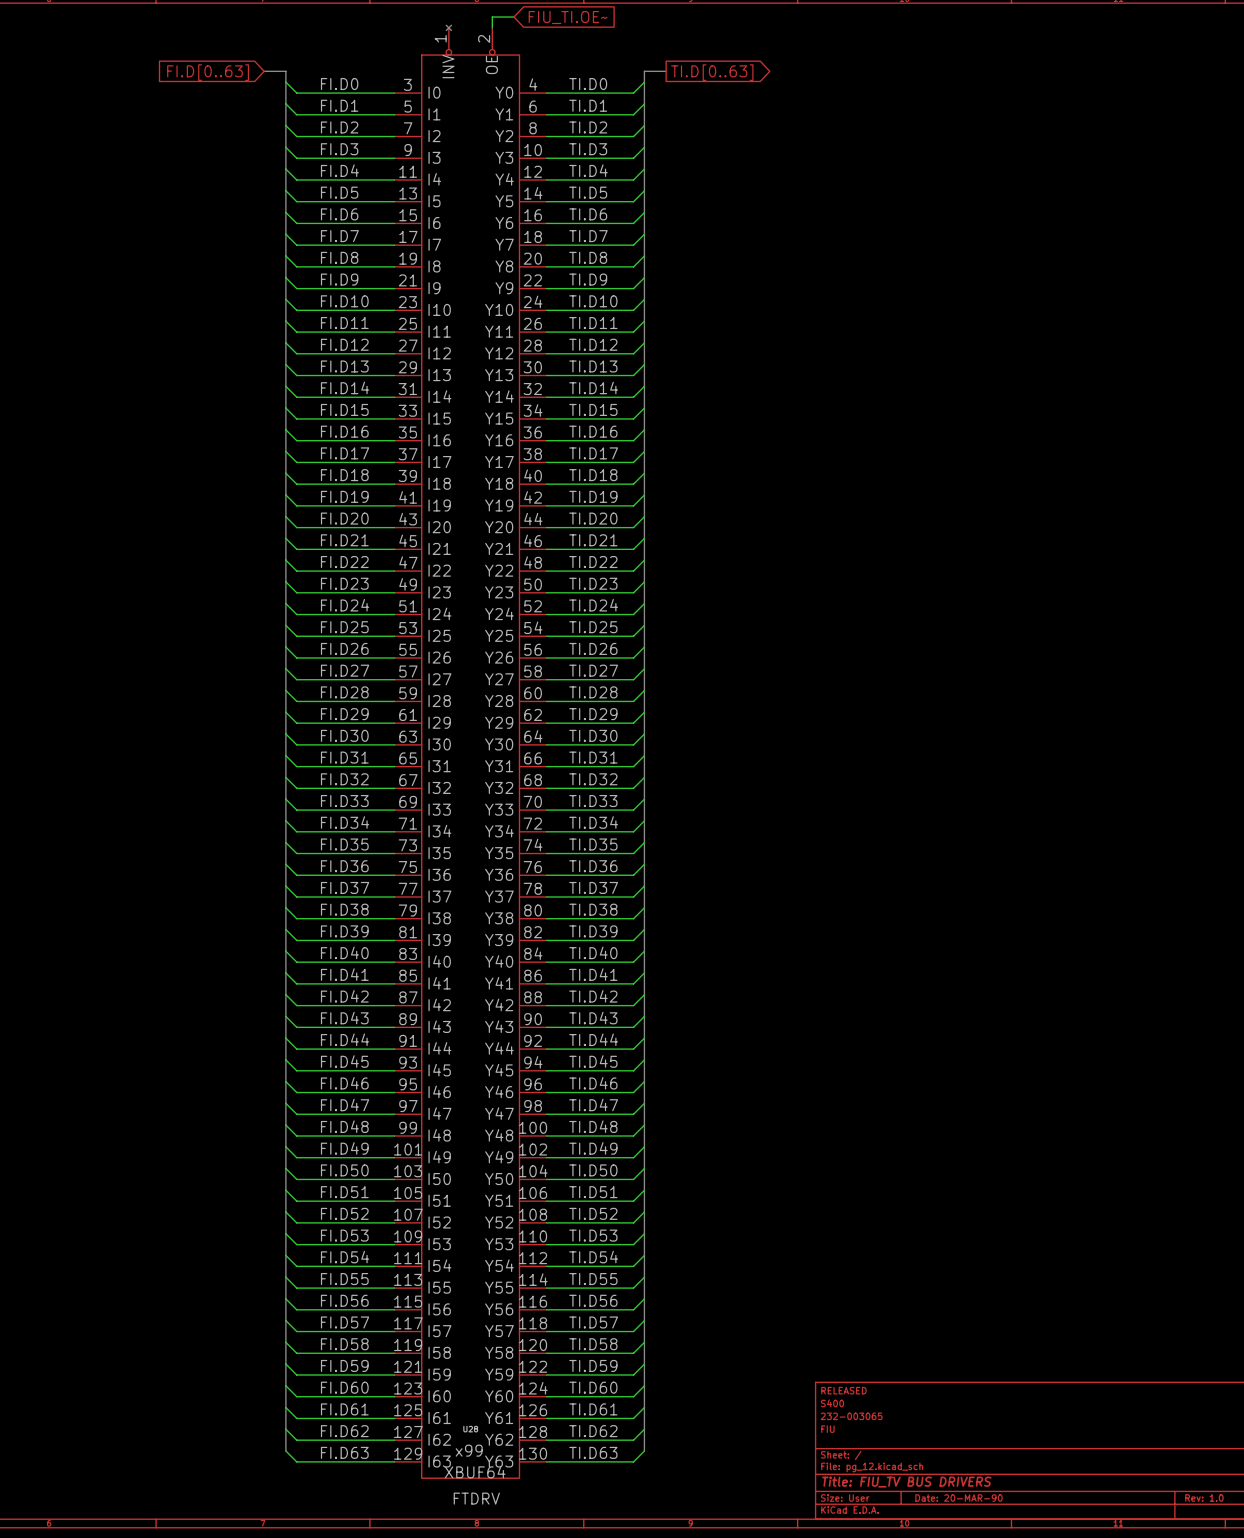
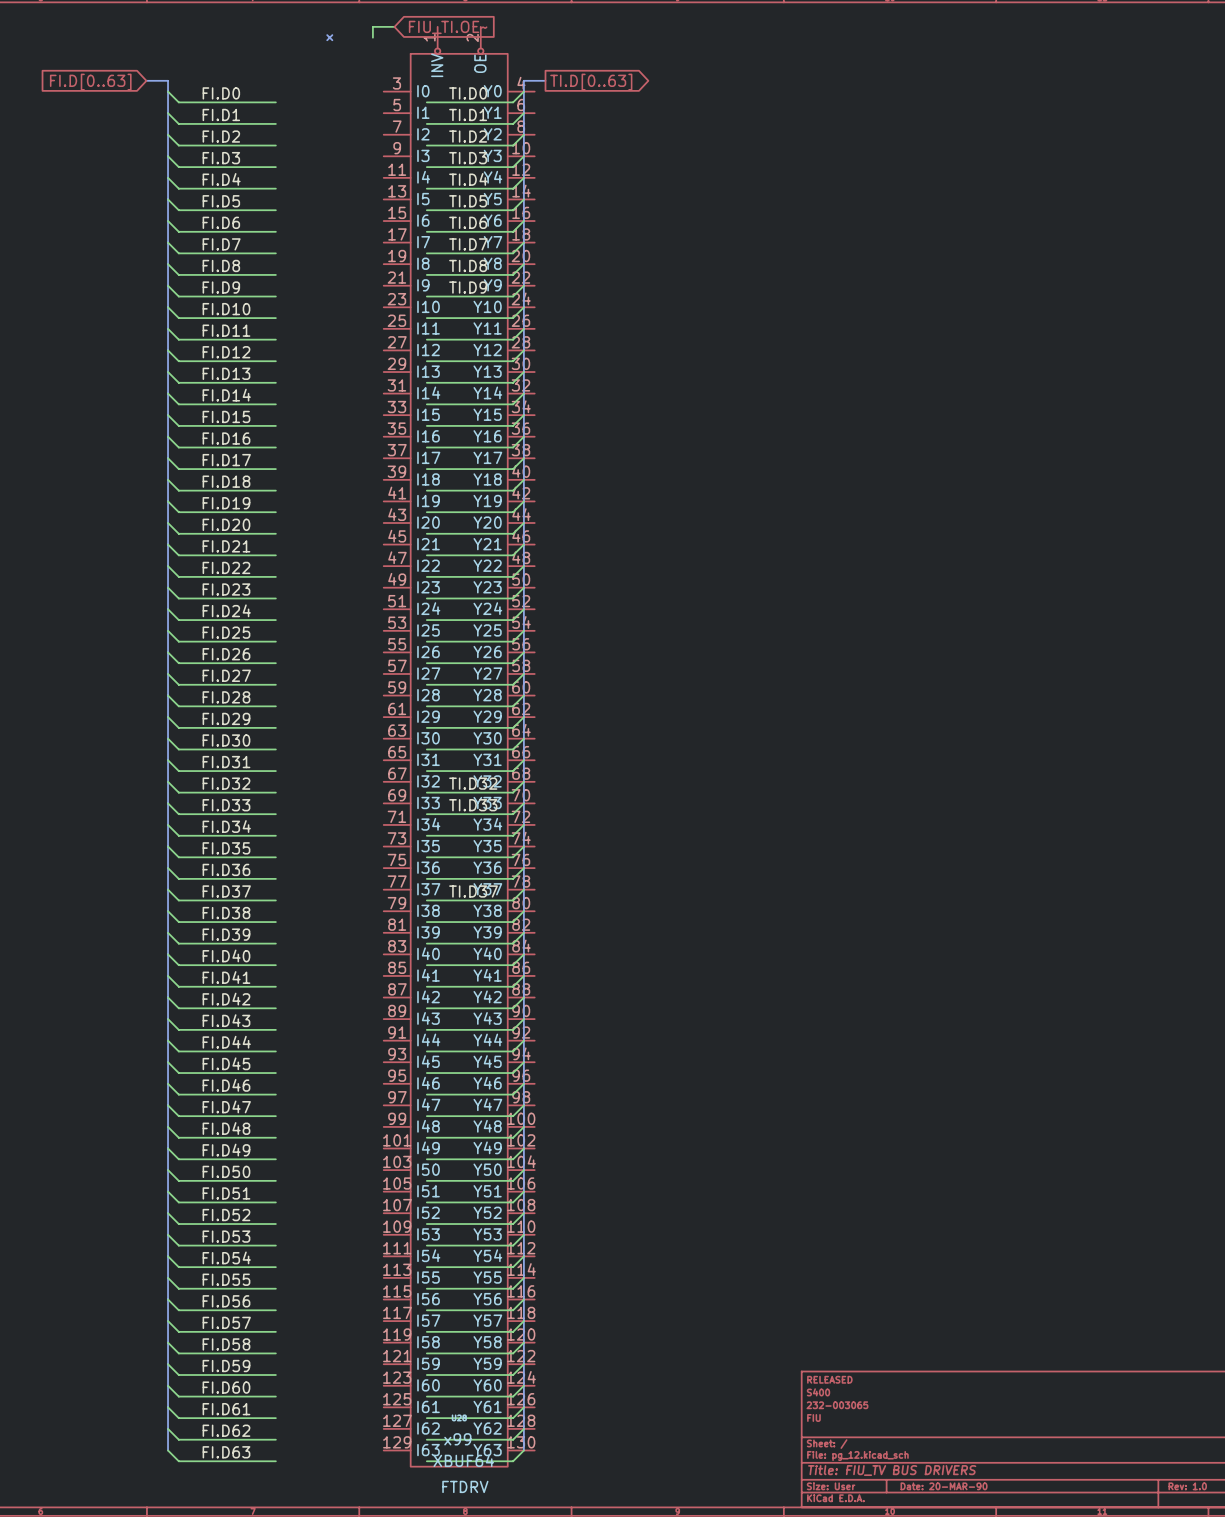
wire: (514, 17) (492, 17) (492, 27) -> none
global label: FIU_TI.OE~ (568, 17) -> none
wire: none -> (394, 26) (372, 26) (372, 37)
no-connect mark: (448, 27) -> none
global label: none -> FIU_TI.OE~ (448, 27)
no-connect mark: none -> (329, 37)
bus: (264, 71) (285, 71) (285, 1451) -> none
bus: (666, 71) (644, 71) (644, 1451) -> none
global label: FI.D[0..63] (208, 72) -> none
global label: TI.D[0..63] (712, 72) -> none
bus: none -> (146, 80) (168, 80) (168, 1450)
wire: (285, 82) (296, 93) (394, 93) -> none
bus: none -> (545, 80) (523, 80) (523, 1450)
wire: (644, 82) (633, 93) (546, 93) -> none
global label: none -> FI.D[0..63] (90, 82)
global label: none -> TI.D[0..63] (591, 82)
label: FI.D0 (339, 84) -> none
label: TI.D0 (588, 84) -> none
wire: none -> (523, 91) (513, 102) (426, 102)
label: none -> FI.D0 (221, 93)
label: none -> TI.D0 (468, 93)
wire: (285, 103) (296, 114) (394, 114) -> (275, 102) (178, 102) (168, 91)
wire: (644, 103) (633, 114) (546, 114) -> none
label: FI.D1 (339, 105) -> none
label: TI.D1 (588, 105) -> none
wire: none -> (523, 113) (513, 123) (426, 123)
label: none -> FI.D1 (221, 114)
label: none -> TI.D1 (468, 114)
wire: (285, 125) (296, 136) (394, 136) -> (275, 123) (178, 123) (168, 113)
wire: (644, 125) (633, 136) (546, 136) -> none
label: FI.D2 (339, 127) -> none
label: TI.D2 (588, 127) -> none
wire: none -> (523, 134) (513, 145) (426, 145)
label: none -> FI.D2 (221, 136)
label: none -> TI.D2 (468, 136)
wire: (285, 147) (296, 158) (394, 158) -> (275, 145) (178, 145) (168, 134)
wire: (644, 147) (633, 158) (546, 158) -> none
label: FI.D3 (339, 149) -> none
label: TI.D3 (588, 149) -> none
wire: none -> (523, 156) (513, 167) (426, 167)
label: none -> FI.D3 (221, 158)
label: none -> TI.D3 (468, 158)
wire: (285, 169) (296, 179) (394, 179) -> (275, 167) (178, 167) (168, 156)
wire: (644, 169) (633, 179) (546, 179) -> none
label: FI.D4 (339, 170) -> none
label: TI.D4 (588, 170) -> none
wire: none -> (523, 177) (513, 188) (426, 188)
label: none -> FI.D4 (221, 179)
label: none -> TI.D4 (468, 179)
wire: (285, 190) (296, 201) (394, 201) -> (275, 188) (178, 188) (168, 177)
wire: (644, 190) (633, 201) (546, 201) -> none
label: FI.D5 (339, 192) -> none
label: TI.D5 (588, 192) -> none
wire: none -> (523, 199) (513, 210) (426, 210)
label: none -> FI.D5 (221, 201)
label: none -> TI.D5 (468, 201)
wire: (285, 212) (296, 223) (394, 223) -> (275, 210) (178, 210) (168, 199)
wire: (644, 212) (633, 223) (546, 223) -> none
label: FI.D6 (339, 214) -> none
label: TI.D6 (588, 214) -> none
wire: none -> (523, 221) (513, 231) (426, 231)
label: none -> FI.D6 (221, 222)
label: none -> TI.D6 (468, 222)
wire: (285, 234) (296, 245) (394, 245) -> (275, 231) (178, 231) (168, 221)
wire: (644, 234) (633, 245) (546, 245) -> none
label: FI.D7 (339, 236) -> none
label: TI.D7 (588, 236) -> none
wire: none -> (523, 242) (513, 253) (426, 253)
label: none -> FI.D7 (221, 244)
label: none -> TI.D7 (468, 244)
wire: (285, 256) (296, 266) (394, 266) -> (275, 253) (178, 253) (168, 242)
wire: (644, 256) (633, 266) (546, 266) -> none
label: FI.D8 (339, 257) -> none
label: TI.D8 (588, 257) -> none
wire: none -> (523, 264) (513, 274) (426, 274)
label: none -> FI.D8 (221, 265)
label: none -> TI.D8 (468, 265)
wire: (285, 277) (296, 288) (394, 288) -> (275, 274) (178, 274) (168, 264)
wire: (644, 277) (633, 288) (546, 288) -> none
label: FI.D9 (339, 279) -> none
label: TI.D9 (588, 279) -> none
wire: none -> (523, 285) (513, 296) (426, 296)
label: none -> FI.D9 (221, 287)
label: none -> TI.D9 (468, 287)
wire: (285, 299) (296, 310) (394, 310) -> (275, 296) (178, 296) (168, 285)
wire: (644, 299) (633, 310) (546, 310) -> none
label: FI.D10 (344, 301) -> none
label: TI.D10 (593, 301) -> none
wire: none -> (523, 307) (513, 318) (426, 318)
label: none -> FI.D10 (226, 309)
wire: (285, 321) (296, 332) (394, 332) -> (275, 318) (178, 318) (168, 307)
wire: (644, 321) (633, 332) (546, 332) -> none
label: FI.D11 (344, 323) -> none
label: TI.D11 (593, 323) -> none
wire: none -> (523, 328) (513, 339) (426, 339)
label: none -> FI.D11 (226, 330)
wire: (285, 342) (296, 353) (394, 353) -> (275, 339) (178, 339) (168, 328)
wire: (644, 342) (633, 353) (546, 353) -> none
label: FI.D12 (344, 344) -> none
label: TI.D12 (593, 344) -> none
wire: none -> (523, 350) (513, 361) (426, 361)
label: none -> FI.D12 (226, 352)
wire: (285, 364) (296, 375) (394, 375) -> (275, 361) (178, 361) (168, 350)
wire: (644, 364) (633, 375) (546, 375) -> none
label: FI.D13 (344, 366) -> none
label: TI.D13 (593, 366) -> none
wire: none -> (523, 372) (513, 382) (426, 382)
label: none -> FI.D13 (226, 373)
wire: (285, 386) (296, 397) (394, 397) -> (275, 382) (178, 382) (168, 372)
wire: (644, 386) (633, 397) (546, 397) -> none
label: FI.D14 (345, 387) -> none
label: TI.D14 (593, 387) -> none
wire: none -> (523, 393) (513, 404) (426, 404)
label: none -> FI.D14 (226, 395)
wire: (285, 408) (296, 418) (394, 418) -> (275, 404) (178, 404) (168, 393)
wire: (644, 408) (633, 418) (546, 418) -> none
label: FI.D15 (344, 409) -> none
label: TI.D15 (593, 409) -> none
wire: none -> (523, 415) (513, 425) (426, 425)
label: none -> FI.D15 (226, 416)
wire: (285, 429) (296, 440) (394, 440) -> (275, 425) (178, 425) (168, 415)
wire: (644, 429) (633, 440) (546, 440) -> none
label: FI.D16 (344, 431) -> none
label: TI.D16 (593, 431) -> none
wire: none -> (523, 436) (513, 447) (426, 447)
label: none -> FI.D16 (226, 438)
wire: (285, 451) (296, 462) (394, 462) -> (275, 447) (178, 447) (168, 436)
wire: (644, 451) (633, 462) (546, 462) -> none
label: FI.D17 (345, 453) -> none
label: TI.D17 (593, 453) -> none
wire: none -> (523, 458) (513, 469) (426, 469)
label: none -> FI.D17 (226, 460)
wire: (285, 473) (296, 484) (394, 484) -> (275, 469) (178, 469) (168, 458)
wire: (644, 473) (633, 484) (546, 484) -> none
label: FI.D18 (344, 475) -> none
label: TI.D18 (593, 475) -> none
wire: none -> (523, 479) (513, 490) (426, 490)
label: none -> FI.D18 (226, 481)
wire: (285, 495) (296, 505) (394, 505) -> (275, 490) (178, 490) (168, 479)
wire: (644, 495) (633, 505) (546, 505) -> none
label: FI.D19 (344, 496) -> none
label: TI.D19 (593, 496) -> none
wire: none -> (523, 501) (513, 512) (426, 512)
label: none -> FI.D19 (226, 503)
wire: (285, 516) (296, 527) (394, 527) -> (275, 512) (178, 512) (168, 501)
wire: (644, 516) (633, 527) (546, 527) -> none
label: FI.D20 (344, 518) -> none
label: TI.D20 (593, 518) -> none
wire: none -> (523, 522) (513, 533) (426, 533)
label: none -> FI.D20 (226, 524)
wire: (285, 538) (296, 549) (394, 549) -> (275, 533) (178, 533) (168, 522)
wire: (644, 538) (633, 549) (546, 549) -> none
label: FI.D21 (344, 540) -> none
label: TI.D21 (593, 540) -> none
wire: none -> (523, 544) (513, 555) (426, 555)
label: none -> FI.D21 (226, 546)
wire: (285, 560) (296, 571) (394, 571) -> (275, 555) (178, 555) (168, 544)
wire: (644, 560) (633, 571) (546, 571) -> none
label: FI.D22 (344, 562) -> none
label: TI.D22 (593, 562) -> none
wire: none -> (523, 566) (513, 576) (426, 576)
label: none -> FI.D22 (226, 567)
wire: (285, 581) (296, 592) (394, 592) -> (275, 576) (178, 576) (168, 566)
wire: (644, 581) (633, 592) (546, 592) -> none
label: FI.D23 (344, 583) -> none
label: TI.D23 (593, 583) -> none
wire: none -> (523, 587) (513, 598) (426, 598)
label: none -> FI.D23 (226, 589)
wire: (285, 603) (296, 614) (394, 614) -> (275, 598) (178, 598) (168, 587)
wire: (644, 603) (633, 614) (546, 614) -> none
label: FI.D24 (345, 605) -> none
label: TI.D24 (593, 605) -> none
wire: none -> (523, 609) (513, 620) (426, 620)
label: none -> FI.D24 (226, 610)
wire: (285, 625) (296, 636) (394, 636) -> (275, 620) (178, 620) (168, 609)
wire: (644, 625) (633, 636) (546, 636) -> none
label: FI.D25 (344, 627) -> none
label: TI.D25 (593, 627) -> none
wire: none -> (523, 630) (513, 641) (426, 641)
label: none -> FI.D25 (226, 632)
wire: (285, 647) (296, 657) (394, 657) -> (275, 641) (178, 641) (168, 630)
wire: (644, 647) (633, 657) (546, 657) -> none
label: FI.D26 (344, 648) -> none
label: TI.D26 (593, 648) -> none
wire: none -> (523, 652) (513, 663) (426, 663)
label: none -> FI.D26 (226, 654)
wire: (285, 668) (296, 679) (394, 679) -> (275, 663) (178, 663) (168, 652)
wire: (644, 668) (633, 679) (546, 679) -> none
label: FI.D27 (345, 670) -> none
label: TI.D27 (593, 670) -> none
wire: none -> (523, 673) (513, 684) (426, 684)
label: none -> FI.D27 (226, 675)
wire: (285, 690) (296, 701) (394, 701) -> (275, 684) (178, 684) (168, 673)
wire: (644, 690) (633, 701) (546, 701) -> none
label: FI.D28 (344, 692) -> none
label: TI.D28 (593, 692) -> none
wire: none -> (523, 695) (513, 706) (426, 706)
label: none -> FI.D28 (226, 697)
wire: (285, 712) (296, 723) (394, 723) -> (275, 706) (178, 706) (168, 695)
wire: (644, 712) (633, 723) (546, 723) -> none
label: FI.D29 (344, 714) -> none
label: TI.D29 (593, 714) -> none
wire: none -> (523, 717) (513, 727) (426, 727)
label: none -> FI.D29 (226, 718)
wire: (285, 734) (296, 744) (394, 744) -> (275, 727) (178, 727) (168, 717)
wire: (644, 734) (633, 744) (546, 744) -> none
label: FI.D30 (344, 735) -> none
label: TI.D30 (593, 735) -> none
wire: none -> (523, 738) (513, 749) (426, 749)
label: none -> FI.D30 (226, 740)
wire: (285, 755) (296, 766) (394, 766) -> (275, 749) (178, 749) (168, 738)
wire: (644, 755) (633, 766) (546, 766) -> none
label: FI.D31 (344, 757) -> none
label: TI.D31 (593, 757) -> none
wire: none -> (523, 760) (513, 771) (426, 771)
label: none -> FI.D31 (226, 762)
wire: (285, 777) (296, 788) (394, 788) -> (275, 771) (178, 771) (168, 760)
wire: (644, 777) (633, 788) (546, 788) -> none
label: FI.D32 (344, 779) -> none
label: TI.D32 (593, 779) -> none
wire: none -> (523, 781) (513, 792) (426, 792)
label: none -> FI.D32 (226, 783)
label: none -> TI.D32 (473, 783)
wire: (285, 799) (296, 810) (394, 810) -> (275, 792) (178, 792) (168, 781)
wire: (644, 799) (633, 810) (546, 810) -> none
label: FI.D33 (344, 801) -> none
label: TI.D33 (593, 801) -> none
wire: none -> (523, 803) (513, 814) (426, 814)
label: none -> FI.D33 (226, 805)
label: none -> TI.D33 (473, 805)
wire: (285, 820) (296, 831) (394, 831) -> (275, 814) (178, 814) (168, 803)
wire: (644, 820) (633, 831) (546, 831) -> none
label: FI.D34 (345, 822) -> none
label: TI.D34 (593, 822) -> none
wire: none -> (523, 824) (513, 835) (426, 835)
label: none -> FI.D34 (226, 826)
wire: (285, 842) (296, 853) (394, 853) -> (275, 835) (178, 835) (168, 824)
wire: (644, 842) (633, 853) (546, 853) -> none
label: FI.D35 (344, 844) -> none
label: TI.D35 (593, 844) -> none
wire: none -> (523, 846) (513, 857) (426, 857)
label: none -> FI.D35 (226, 848)
wire: (285, 864) (296, 875) (394, 875) -> (275, 857) (178, 857) (168, 846)
wire: (644, 864) (633, 875) (546, 875) -> none
label: FI.D36 (344, 866) -> none
label: TI.D36 (593, 866) -> none
wire: none -> (523, 868) (513, 878) (426, 878)
label: none -> FI.D36 (226, 869)
wire: (285, 886) (296, 896) (394, 896) -> (275, 878) (178, 878) (168, 868)
wire: (644, 886) (633, 896) (546, 896) -> none
label: FI.D37 (345, 887) -> none
label: TI.D37 (593, 887) -> none
wire: none -> (523, 889) (513, 900) (426, 900)
label: none -> FI.D37 (226, 891)
label: none -> TI.D37 (473, 891)
wire: (285, 907) (296, 918) (394, 918) -> (275, 900) (178, 900) (168, 889)
wire: (644, 907) (633, 918) (546, 918) -> none
label: FI.D38 (344, 909) -> none
label: TI.D38 (593, 909) -> none
wire: none -> (523, 911) (513, 922) (426, 922)
label: none -> FI.D38 (226, 913)
wire: (285, 929) (296, 940) (394, 940) -> (275, 922) (178, 922) (168, 911)
wire: (644, 929) (633, 940) (546, 940) -> none
label: FI.D39 (344, 931) -> none
label: TI.D39 (593, 931) -> none
wire: none -> (523, 932) (513, 943) (426, 943)
label: none -> FI.D39 (226, 934)
wire: (285, 951) (296, 962) (394, 962) -> (275, 943) (178, 943) (168, 932)
wire: (644, 951) (633, 962) (546, 962) -> none
label: FI.D40 (344, 952) -> none
label: TI.D40 (593, 952) -> none
wire: none -> (523, 954) (513, 965) (426, 965)
label: none -> FI.D40 (226, 955)
wire: (285, 973) (296, 983) (394, 983) -> (275, 965) (178, 965) (168, 954)
wire: (644, 973) (633, 983) (546, 983) -> none
label: FI.D41 (344, 974) -> none
label: TI.D41 (593, 974) -> none
wire: none -> (523, 975) (513, 986) (426, 986)
label: none -> FI.D41 (226, 977)
wire: (285, 994) (296, 1005) (394, 1005) -> (275, 986) (178, 986) (168, 975)
wire: (644, 994) (633, 1005) (546, 1005) -> none
label: FI.D42 (344, 996) -> none
label: TI.D42 (593, 996) -> none
wire: none -> (523, 997) (513, 1008) (426, 1008)
label: none -> FI.D42 (226, 999)
wire: (285, 1016) (296, 1027) (394, 1027) -> (275, 1008) (178, 1008) (168, 997)
wire: (644, 1016) (633, 1027) (546, 1027) -> none
label: FI.D43 (344, 1018) -> none
label: TI.D43 (593, 1018) -> none
wire: none -> (523, 1019) (513, 1029) (426, 1029)
label: none -> FI.D43 (226, 1020)
wire: (285, 1038) (296, 1049) (394, 1049) -> (275, 1029) (178, 1029) (168, 1019)
wire: (644, 1038) (633, 1049) (546, 1049) -> none
label: FI.D44 (345, 1039) -> none
label: TI.D44 (593, 1039) -> none
wire: none -> (523, 1040) (513, 1051) (426, 1051)
label: none -> FI.D44 (226, 1042)
wire: (285, 1059) (296, 1070) (394, 1070) -> (275, 1051) (178, 1051) (168, 1040)
wire: (644, 1059) (633, 1070) (546, 1070) -> none
label: FI.D45 (344, 1061) -> none
label: TI.D45 (593, 1061) -> none
wire: none -> (523, 1062) (513, 1073) (426, 1073)
label: none -> FI.D45 (226, 1063)
wire: (285, 1081) (296, 1092) (394, 1092) -> (275, 1073) (178, 1073) (168, 1062)
wire: (644, 1081) (633, 1092) (546, 1092) -> none
label: FI.D46 (344, 1083) -> none
label: TI.D46 (593, 1083) -> none
wire: none -> (523, 1083) (513, 1094) (426, 1094)
label: none -> FI.D46 (226, 1085)
wire: (285, 1103) (296, 1114) (394, 1114) -> (275, 1094) (178, 1094) (168, 1083)
wire: (644, 1103) (633, 1114) (546, 1114) -> none
label: FI.D47 (345, 1104) -> none
label: TI.D47 (593, 1104) -> none
wire: none -> (523, 1105) (513, 1116) (426, 1116)
label: none -> FI.D47 (226, 1106)
wire: (285, 1125) (296, 1135) (394, 1135) -> (275, 1116) (178, 1116) (168, 1105)
wire: (644, 1125) (633, 1135) (546, 1135) -> none
label: FI.D48 (344, 1126) -> none
label: TI.D48 (593, 1126) -> none
wire: none -> (523, 1126) (513, 1137) (426, 1137)
label: none -> FI.D48 (226, 1128)
wire: (285, 1146) (296, 1157) (394, 1157) -> (275, 1137) (178, 1137) (168, 1126)
wire: (644, 1146) (633, 1157) (546, 1157) -> none
label: FI.D49 (344, 1148) -> none
label: TI.D49 (593, 1148) -> none
wire: none -> (523, 1148) (513, 1159) (426, 1159)
label: none -> FI.D49 (226, 1150)
wire: (285, 1168) (296, 1179) (394, 1179) -> (275, 1159) (178, 1159) (168, 1148)
wire: (644, 1168) (633, 1179) (546, 1179) -> none
label: FI.D50 (344, 1170) -> none
label: TI.D50 (593, 1170) -> none
wire: none -> (523, 1170) (513, 1180) (426, 1180)
label: none -> FI.D50 (226, 1171)
wire: (285, 1190) (296, 1201) (394, 1201) -> (275, 1180) (178, 1180) (168, 1170)
wire: (644, 1190) (633, 1201) (546, 1201) -> none
label: FI.D51 (344, 1192) -> none
label: TI.D51 (593, 1192) -> none
wire: none -> (523, 1191) (513, 1202) (426, 1202)
label: none -> FI.D51 (226, 1193)
wire: (285, 1212) (296, 1222) (394, 1222) -> (275, 1202) (178, 1202) (168, 1191)
wire: (644, 1212) (633, 1222) (546, 1222) -> none
label: FI.D52 (344, 1213) -> none
label: TI.D52 (593, 1213) -> none
wire: none -> (523, 1213) (513, 1224) (426, 1224)
label: none -> FI.D52 (226, 1215)
wire: (285, 1233) (296, 1244) (394, 1244) -> (275, 1224) (178, 1224) (168, 1213)
wire: (644, 1233) (633, 1244) (546, 1244) -> none
label: FI.D53 (344, 1235) -> none
label: TI.D53 (593, 1235) -> none
wire: none -> (523, 1234) (513, 1245) (426, 1245)
label: none -> FI.D53 (226, 1236)
wire: (285, 1255) (296, 1266) (394, 1266) -> (275, 1245) (178, 1245) (168, 1234)
wire: (644, 1255) (633, 1266) (546, 1266) -> none
label: FI.D54 (345, 1257) -> none
label: TI.D54 (593, 1257) -> none
wire: none -> (523, 1256) (513, 1267) (426, 1267)
label: none -> FI.D54 (226, 1257)
wire: (285, 1277) (296, 1288) (394, 1288) -> (275, 1267) (178, 1267) (168, 1256)
wire: (644, 1277) (633, 1288) (546, 1288) -> none
label: FI.D55 (344, 1279) -> none
label: TI.D55 (593, 1279) -> none
wire: none -> (523, 1277) (513, 1288) (426, 1288)
label: none -> FI.D55 (226, 1279)
wire: (285, 1298) (296, 1309) (394, 1309) -> (275, 1288) (178, 1288) (168, 1277)
wire: (644, 1298) (633, 1309) (546, 1309) -> none
label: FI.D56 (344, 1300) -> none
label: TI.D56 (593, 1300) -> none
wire: none -> (523, 1299) (513, 1310) (426, 1310)
label: none -> FI.D56 (226, 1301)
wire: (285, 1320) (296, 1331) (394, 1331) -> (275, 1310) (178, 1310) (168, 1299)
wire: (644, 1320) (633, 1331) (546, 1331) -> none
label: FI.D57 (345, 1322) -> none
label: TI.D57 (593, 1322) -> none
wire: none -> (523, 1321) (513, 1331) (426, 1331)
label: none -> FI.D57 (226, 1322)
wire: (285, 1342) (296, 1353) (394, 1353) -> (275, 1331) (178, 1331) (168, 1321)
wire: (644, 1342) (633, 1353) (546, 1353) -> none
label: FI.D58 (344, 1344) -> none
label: TI.D58 (593, 1344) -> none
wire: none -> (523, 1342) (513, 1353) (426, 1353)
label: none -> FI.D58 (226, 1344)
wire: (285, 1364) (296, 1374) (394, 1374) -> (275, 1353) (178, 1353) (168, 1342)
wire: (644, 1364) (633, 1374) (546, 1374) -> none
label: FI.D59 (344, 1365) -> none
label: TI.D59 (593, 1365) -> none
wire: none -> (523, 1364) (513, 1375) (426, 1375)
label: none -> FI.D59 (226, 1366)
wire: (285, 1385) (296, 1396) (394, 1396) -> (275, 1375) (178, 1375) (168, 1364)
wire: (644, 1385) (633, 1396) (546, 1396) -> none
label: FI.D60 (344, 1387) -> none
label: TI.D60 (593, 1387) -> none
wire: none -> (523, 1385) (513, 1396) (426, 1396)
label: none -> FI.D60 (226, 1387)
wire: (285, 1407) (296, 1418) (394, 1418) -> (275, 1396) (178, 1396) (168, 1385)
wire: (644, 1407) (633, 1418) (546, 1418) -> none
label: FI.D61 (344, 1409) -> none
label: TI.D61 (593, 1409) -> none
wire: none -> (523, 1407) (513, 1418) (426, 1418)
label: none -> FI.D61 (226, 1409)
wire: (285, 1429) (296, 1440) (394, 1440) -> (275, 1418) (178, 1418) (168, 1407)
wire: (644, 1429) (633, 1440) (546, 1440) -> none
label: FI.D62 (344, 1431) -> none
label: TI.D62 (593, 1431) -> none
wire: none -> (523, 1428) (513, 1439) (426, 1439)
label: none -> FI.D62 (226, 1430)
wire: (285, 1451) (296, 1461) (394, 1461) -> (275, 1439) (178, 1439) (168, 1428)
wire: (644, 1451) (633, 1461) (546, 1461) -> none
label: FI.D63 (344, 1452) -> none
label: TI.D63 (593, 1452) -> none
wire: none -> (168, 1450) (178, 1461) (275, 1461)
wire: none -> (523, 1450) (513, 1461) (426, 1461)
label: none -> FI.D63 (226, 1452)

